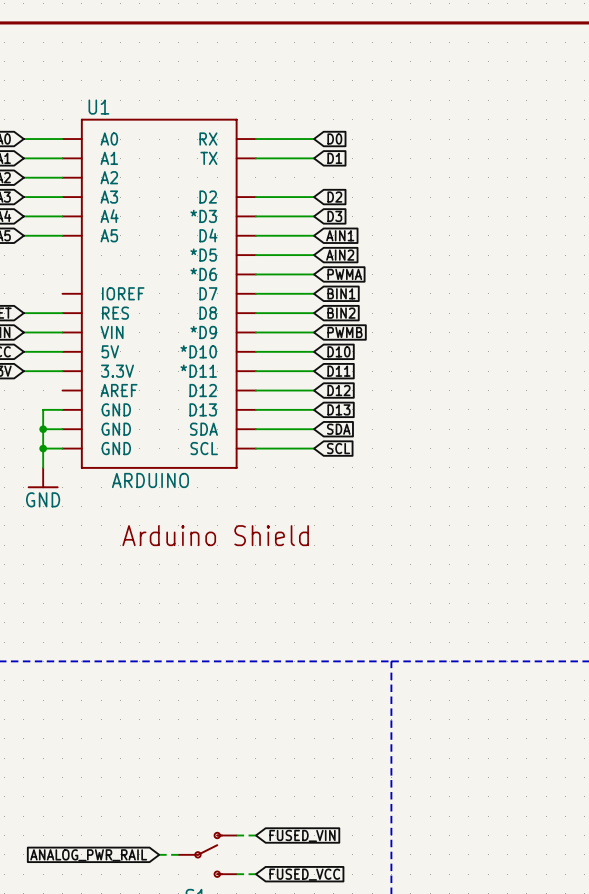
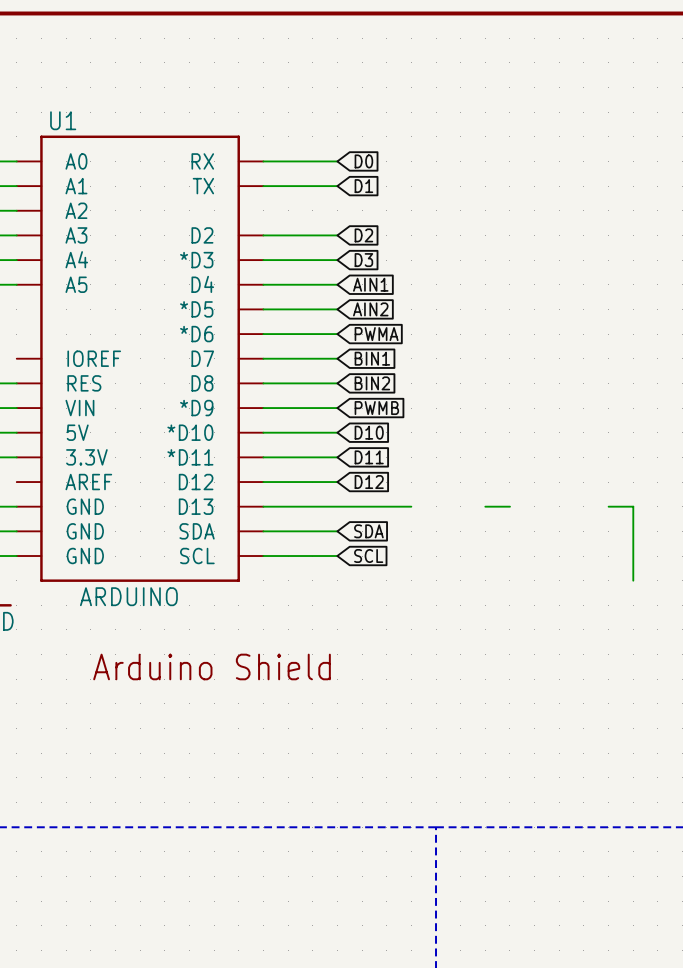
wire: none -> (337, 506) (411, 506)
global label: D13 (338, 409) -> none
wire: none -> (485, 506) (509, 506)
wire: none -> (608, 506) (633, 506) (633, 580)

